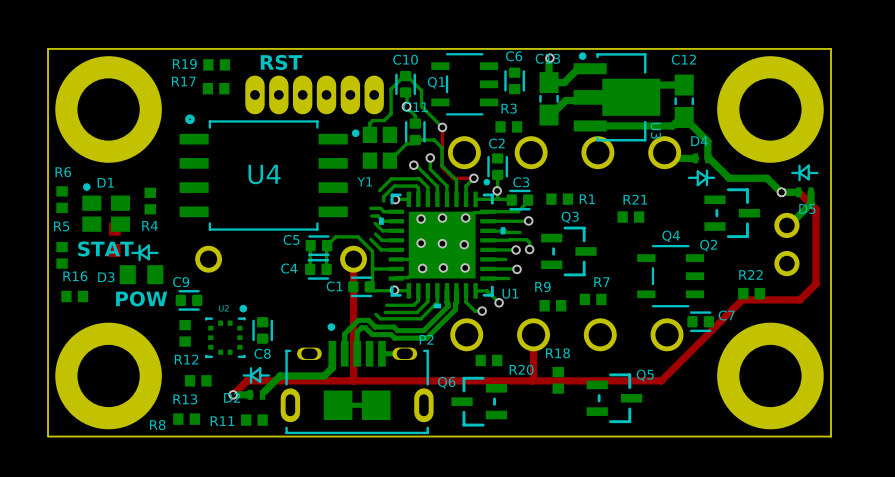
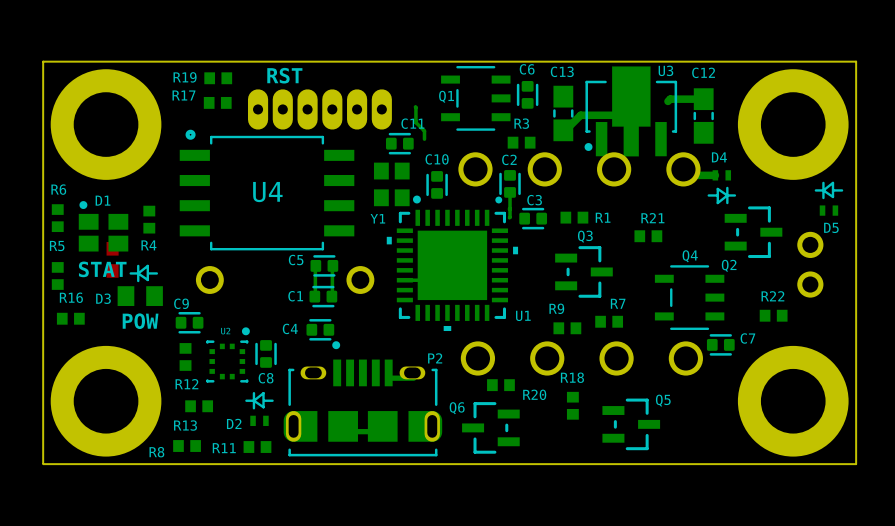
bottom track: (549, 58) (549, 82) (564, 82) (577, 69) -> none
via: (549, 58) -> none
bottom track: (406, 77) (421, 90) (421, 106) (442, 127) -> none
bottom track: (402, 79) (391, 89) (391, 113) (384, 120) (372, 120) (369, 123) (369, 134) -> none
C10 position: (405, 84) -> (437, 184)
U3 rotation: 0° (616, 96) -> 90° counterclockwise (630, 111)
via: (406, 106) -> none
bottom track: (676, 122) (672, 125) (590, 125) -> none
bottom track: (691, 125) (707, 141) (707, 158) -> none
top track: (442, 126) (442, 167) (453, 178) (473, 178) -> none
via: (442, 127) -> none
C11 rotation: 0° (415, 131) -> 90° clockwise (399, 143)
C11 position: (415, 131) -> (399, 143)
bottom track: (418, 140) (434, 140) (441, 147) (441, 165) (456, 180) (456, 199) -> none
bottom track: (413, 143) (406, 143) (389, 160) -> none
Y1 rotation: 0° (374, 147) -> 180° (397, 184)
bottom track: (430, 157) (430, 169) (446, 185) (446, 199) -> none
via: (430, 157) -> none
bottom track: (708, 157) (729, 178) (767, 178) (781, 192) (798, 192) -> none
bottom track: (413, 165) (437, 186) (437, 199) -> none
via: (413, 165) -> none
bottom track: (473, 178) (466, 186) (466, 199) -> none
via: (473, 178) -> none
bottom track: (379, 190) (391, 178) (419, 178) (427, 187) (427, 199) -> none
via: (497, 190) -> none
top track: (781, 192) (799, 192) (816, 209) (816, 283) (800, 299) (742, 299) (661, 380) (247, 380) (233, 394) -> none
via: (781, 192) -> none
bottom track: (811, 192) (811, 203) (790, 224) -> none
via: (395, 199) -> none
bottom track: (408, 199) (395, 199) -> none
bottom track: (418, 199) (418, 187) (416, 186) (394, 186) (383, 196) (383, 201) -> none
bottom track: (475, 199) (511, 199) -> none
bottom track: (524, 204) (517, 211) (474, 212) (465, 218) (471, 216) -> none
bottom track: (370, 208) (380, 208) (383, 211) (396, 211) -> none
bottom track: (371, 216) (378, 216) (383, 221) (396, 221) -> none
via: (421, 218) -> none
via: (442, 218) -> none
via: (465, 218) -> none
via: (528, 220) -> none
bottom track: (528, 221) (487, 221) -> none
bottom track: (375, 223) (382, 230) (396, 230) -> none
bottom track: (492, 231) (519, 232) -> none
bottom track: (375, 234) (381, 240) (396, 240) -> none
bottom track: (370, 239) (381, 249) (396, 249) -> none
bottom track: (487, 240) (526, 239) (529, 242) (529, 249) (527, 249) -> none
via: (421, 243) -> none
via: (442, 243) -> none
via: (464, 244) -> none
bottom track: (327, 245) (335, 236) (358, 236) (372, 251) (371, 285) -> none
bottom track: (487, 249) (516, 250) -> none
via: (529, 249) -> none
via: (516, 250) -> none
top track: (353, 259) (353, 380) -> none
bottom track: (505, 259) (487, 259) -> none
via: (443, 267) -> none
via: (465, 267) -> none
bottom track: (396, 268) (372, 268) -> none
via: (422, 268) -> none
bottom track: (518, 268) (487, 268) -> none
C4 position: (318, 269) -> (320, 329)
via: (517, 269) -> none
bottom track: (411, 273) (408, 277) (396, 278) -> none
bottom track: (508, 278) (487, 278) -> none
C1 position: (361, 286) -> (323, 296)
bottom track: (371, 287) (374, 290) (408, 290) -> none
via: (394, 290) -> none
bottom track: (418, 290) (418, 300) (413, 305) (386, 305) -> none
bottom track: (427, 290) (427, 301) (417, 312) (385, 312) -> none
bottom track: (437, 290) (437, 302) (420, 318) (380, 318) (376, 314) -> none
bottom track: (446, 290) (447, 306) (423, 330) (397, 330) (394, 327) (375, 327) (368, 320) (358, 320) (344, 334) (344, 353) -> none
bottom track: (456, 290) (455, 309) (426, 338) (394, 338) (390, 334) (372, 334) (365, 327) (361, 327) (357, 332) (357, 353) -> none
bottom track: (466, 290) (466, 302) (474, 311) (482, 311) -> none
bottom track: (475, 290) (487, 290) (499, 302) -> none
via: (499, 302) -> none
via: (482, 311) -> none
P2 footprint: [280, 323, 434, 435] -> [283, 341, 443, 457]
top track: (533, 334) (532, 380) -> none
bottom track: (332, 353) (332, 367) (324, 375) (280, 375) (264, 391) -> none
via: (233, 394) -> none
bottom track: (250, 394) (233, 394) -> none

